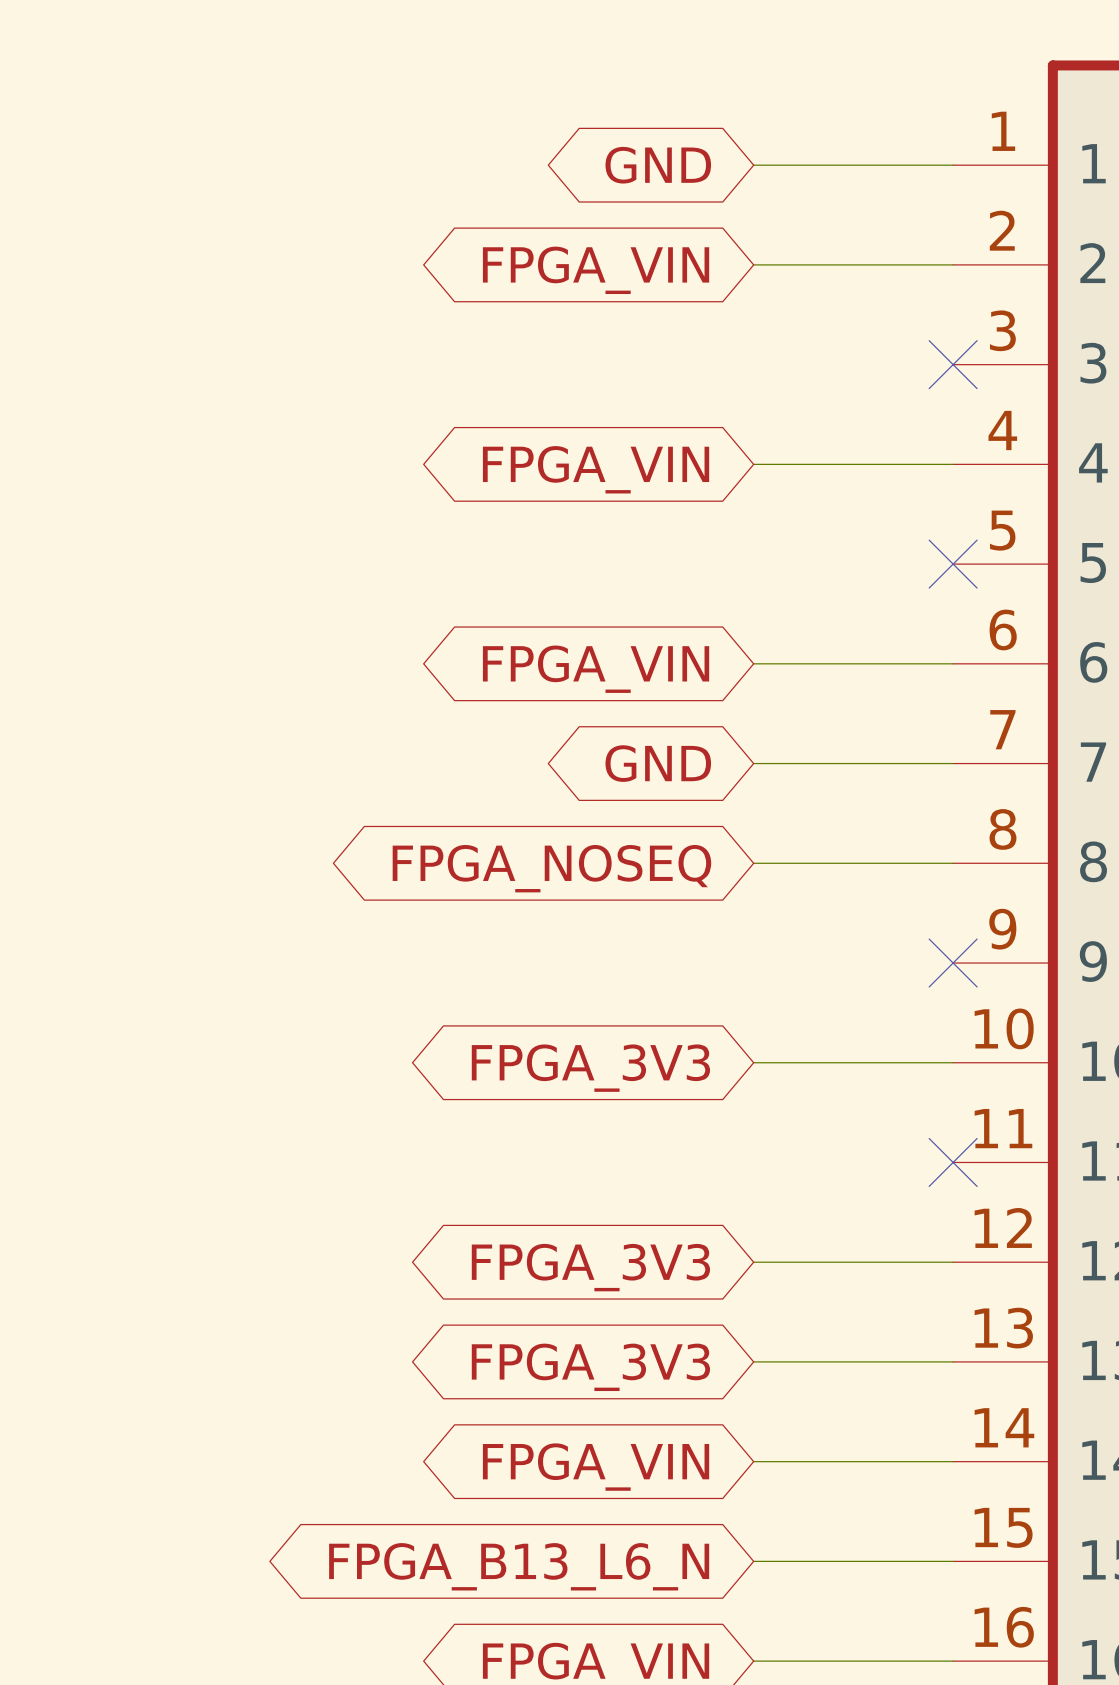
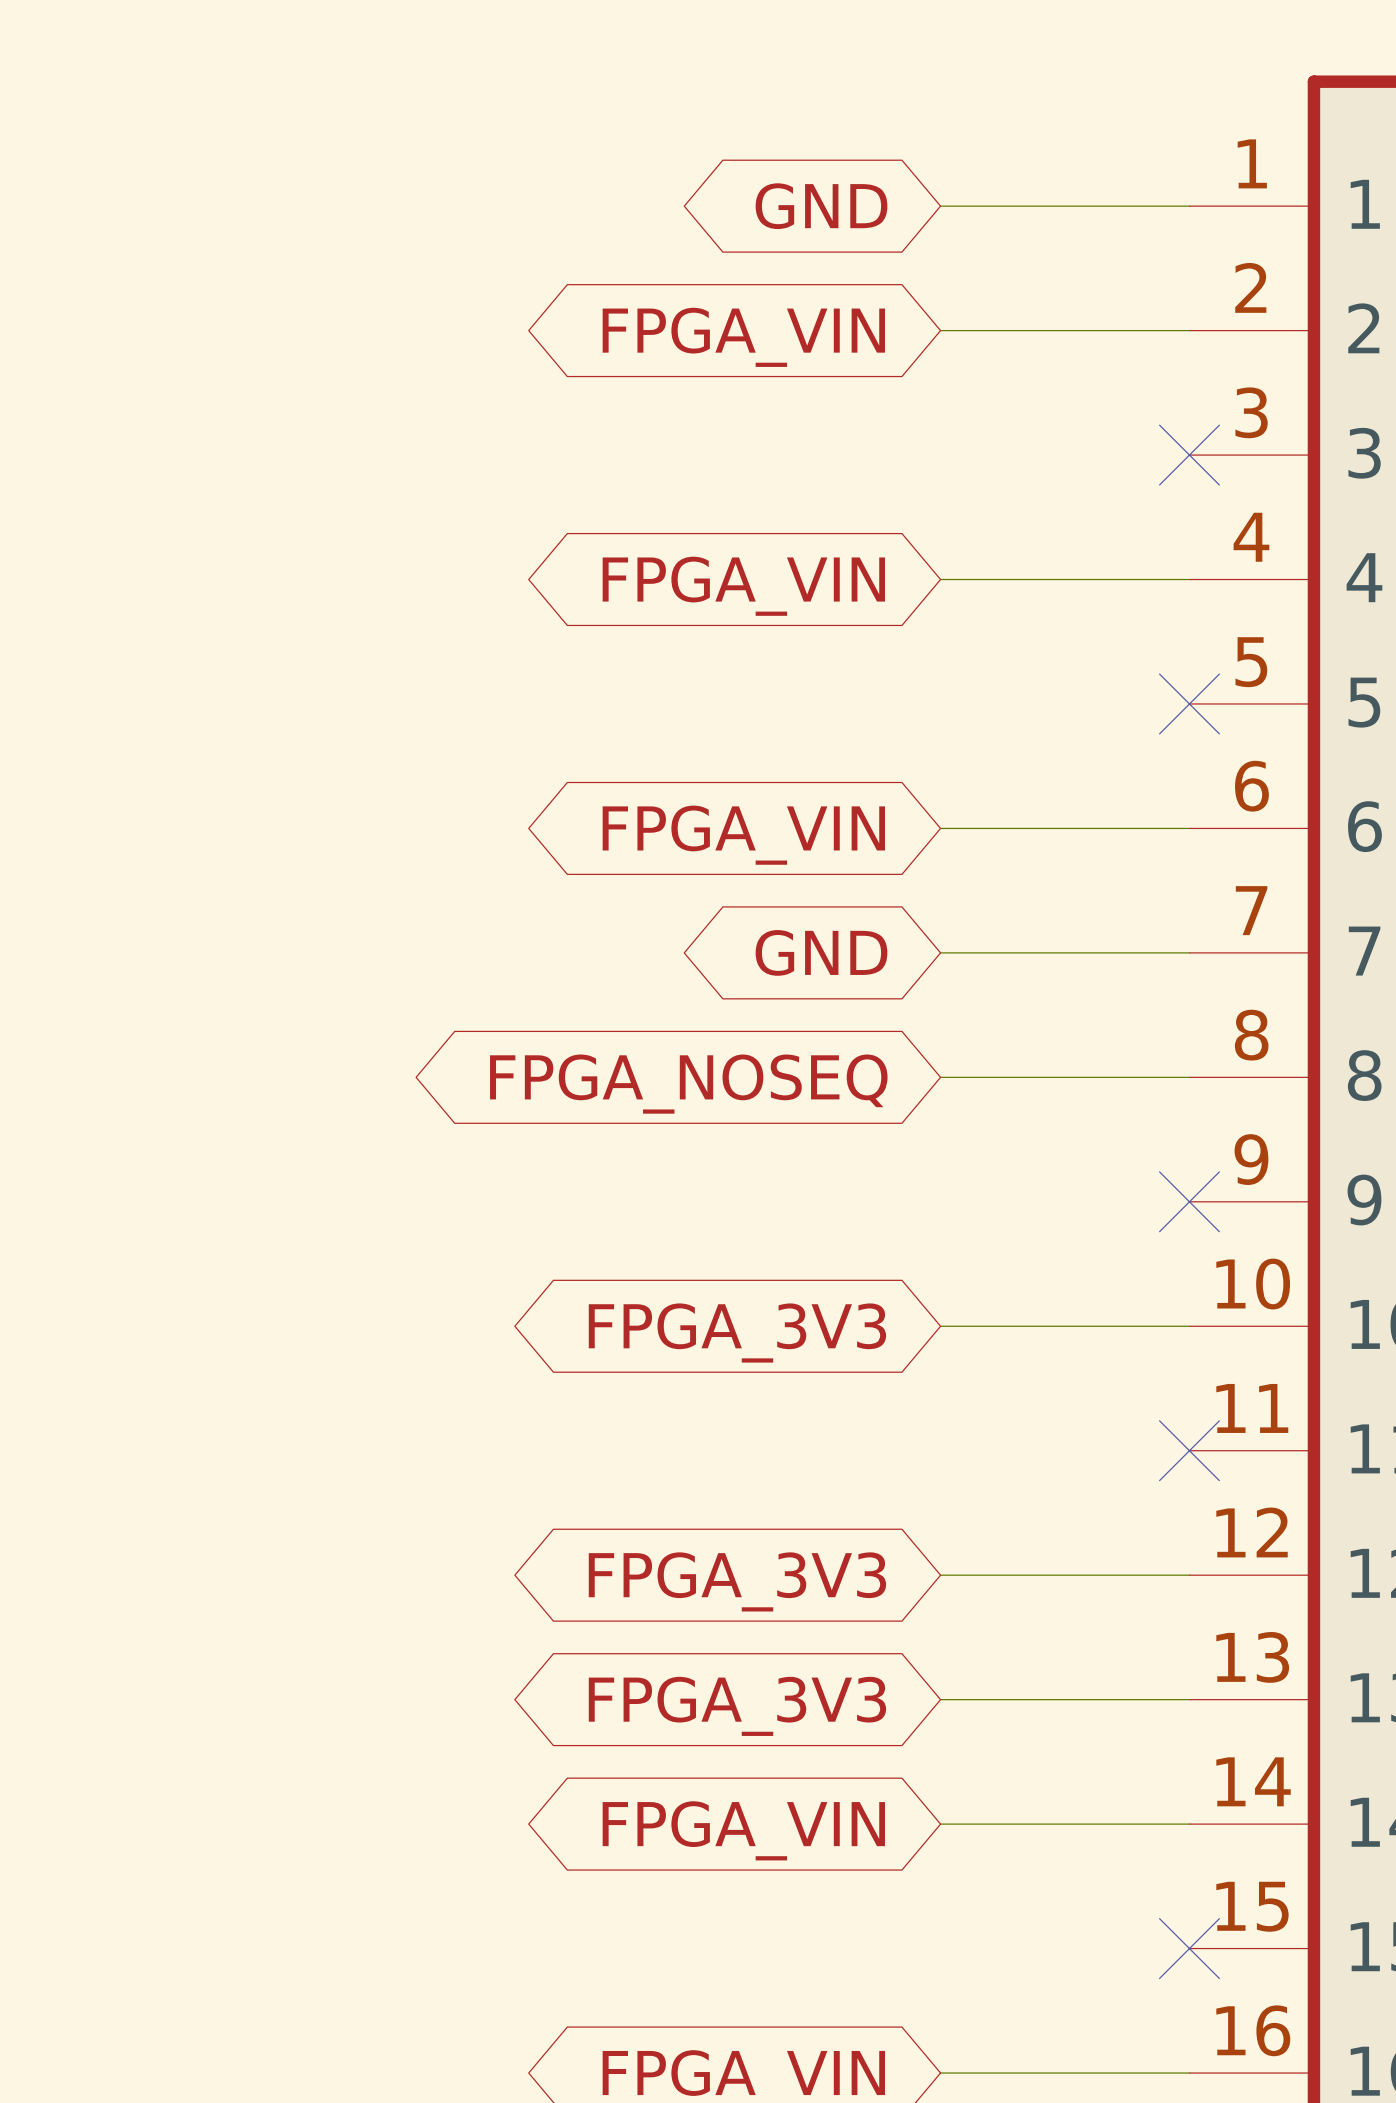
wire: (753, 1561) (953, 1561) -> none
no-connect mark: none -> (1189, 1948)
global label: FPGA_B13_L6_N (519, 1566) -> none

